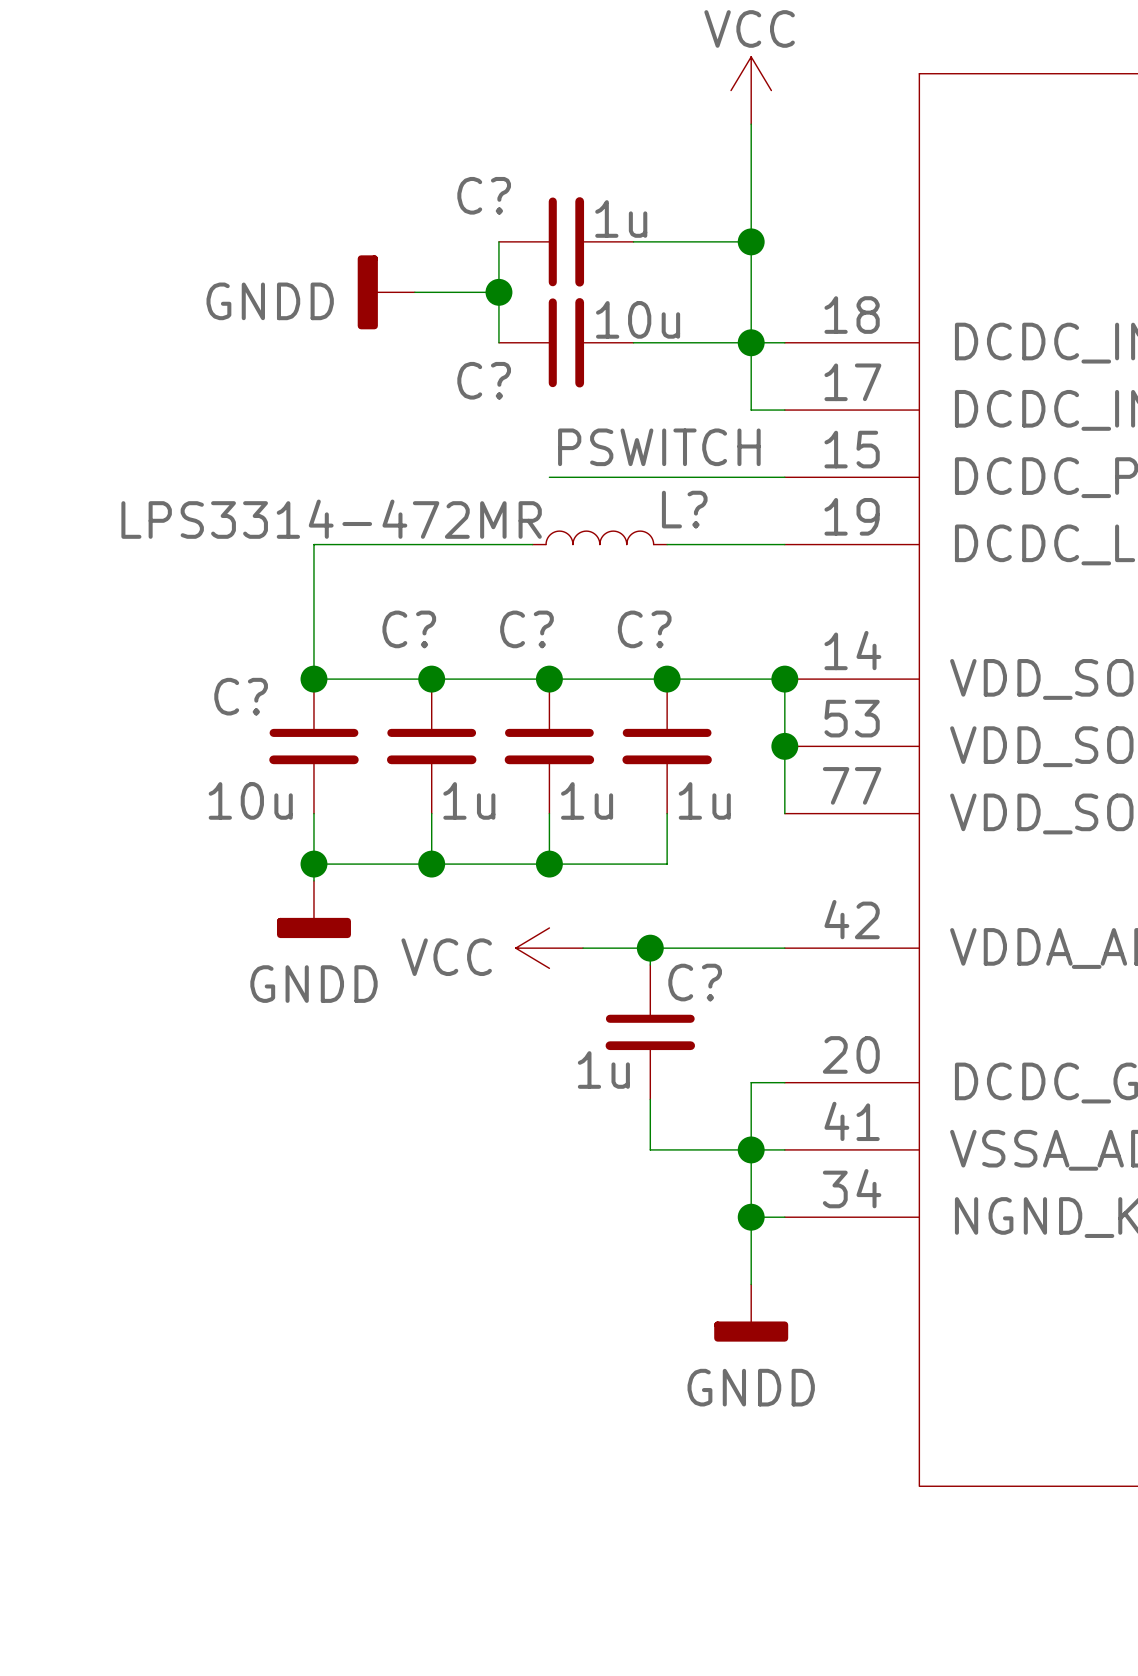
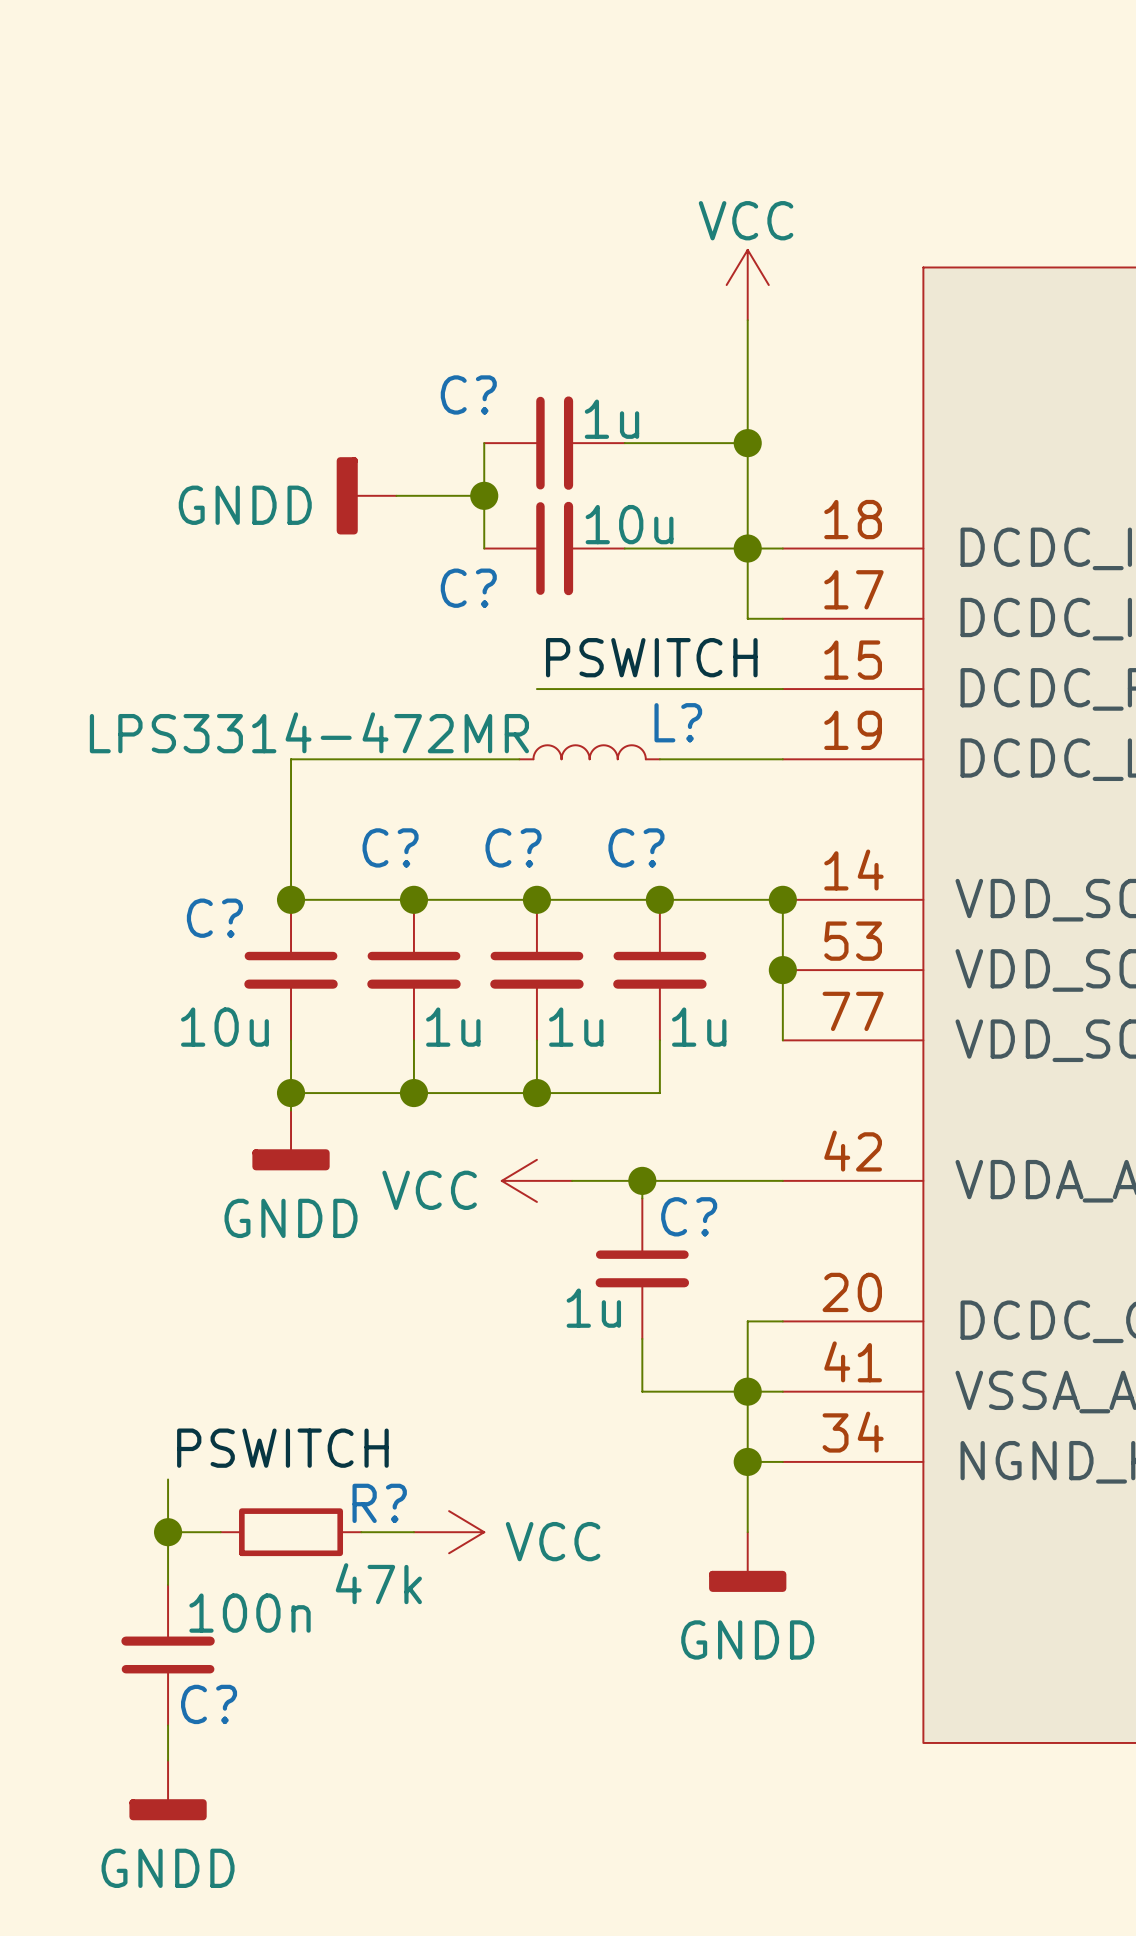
label: none -> PSWITCH (282, 1448)
wire: none -> (168, 1479) (168, 1584)
wire: none -> (168, 1532) (220, 1532)
junction: none -> (168, 1532)
R?: none -> 47k (291, 1532)
wire: none -> (361, 1532) (413, 1532)
power symbol: none -> VCC (449, 1532)
C?: none -> 100n (168, 1655)
wire: none -> (168, 1725) (168, 1760)
power symbol: none -> GNDD (168, 1790)

